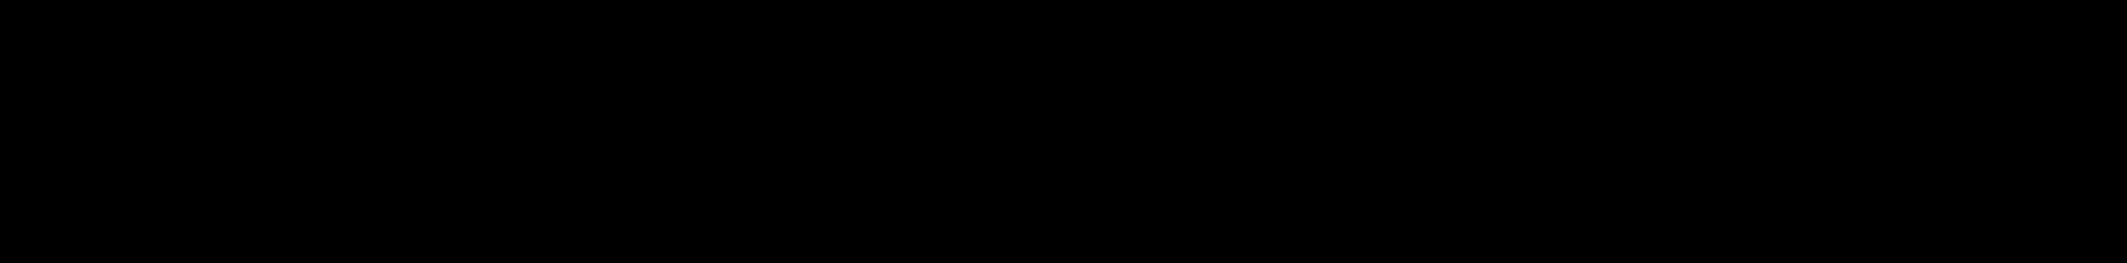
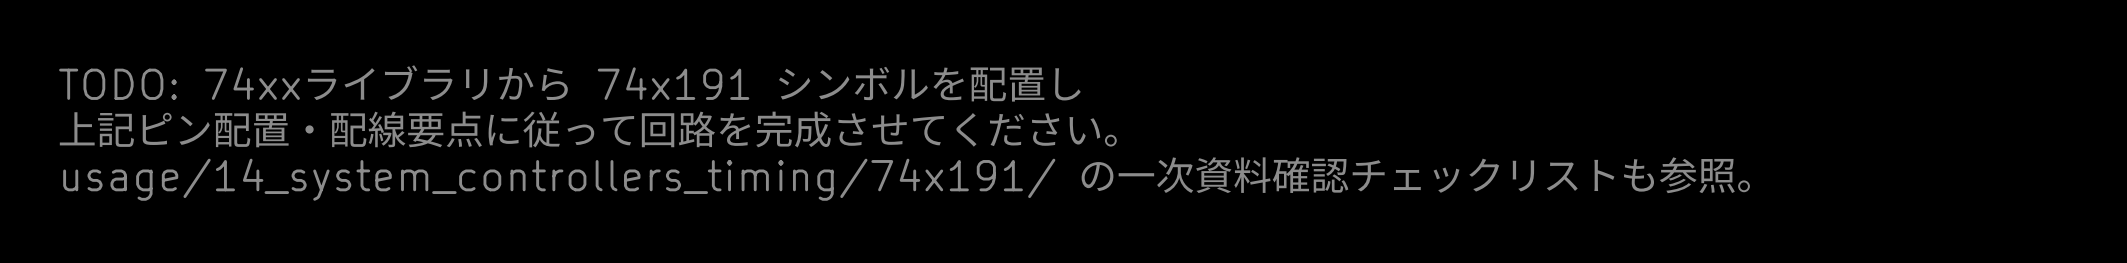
text: none -> TODO: 74xxライブラリから 74x191 シンボルを配置し (570, 83)
text: none -> 上記ピン配置・配線要点に従って回路を完成させてください。 (588, 129)
text: none -> usage/14_system_controllers_timing/74x191/ の一次資料確認チェックリストも参照。 (907, 178)

